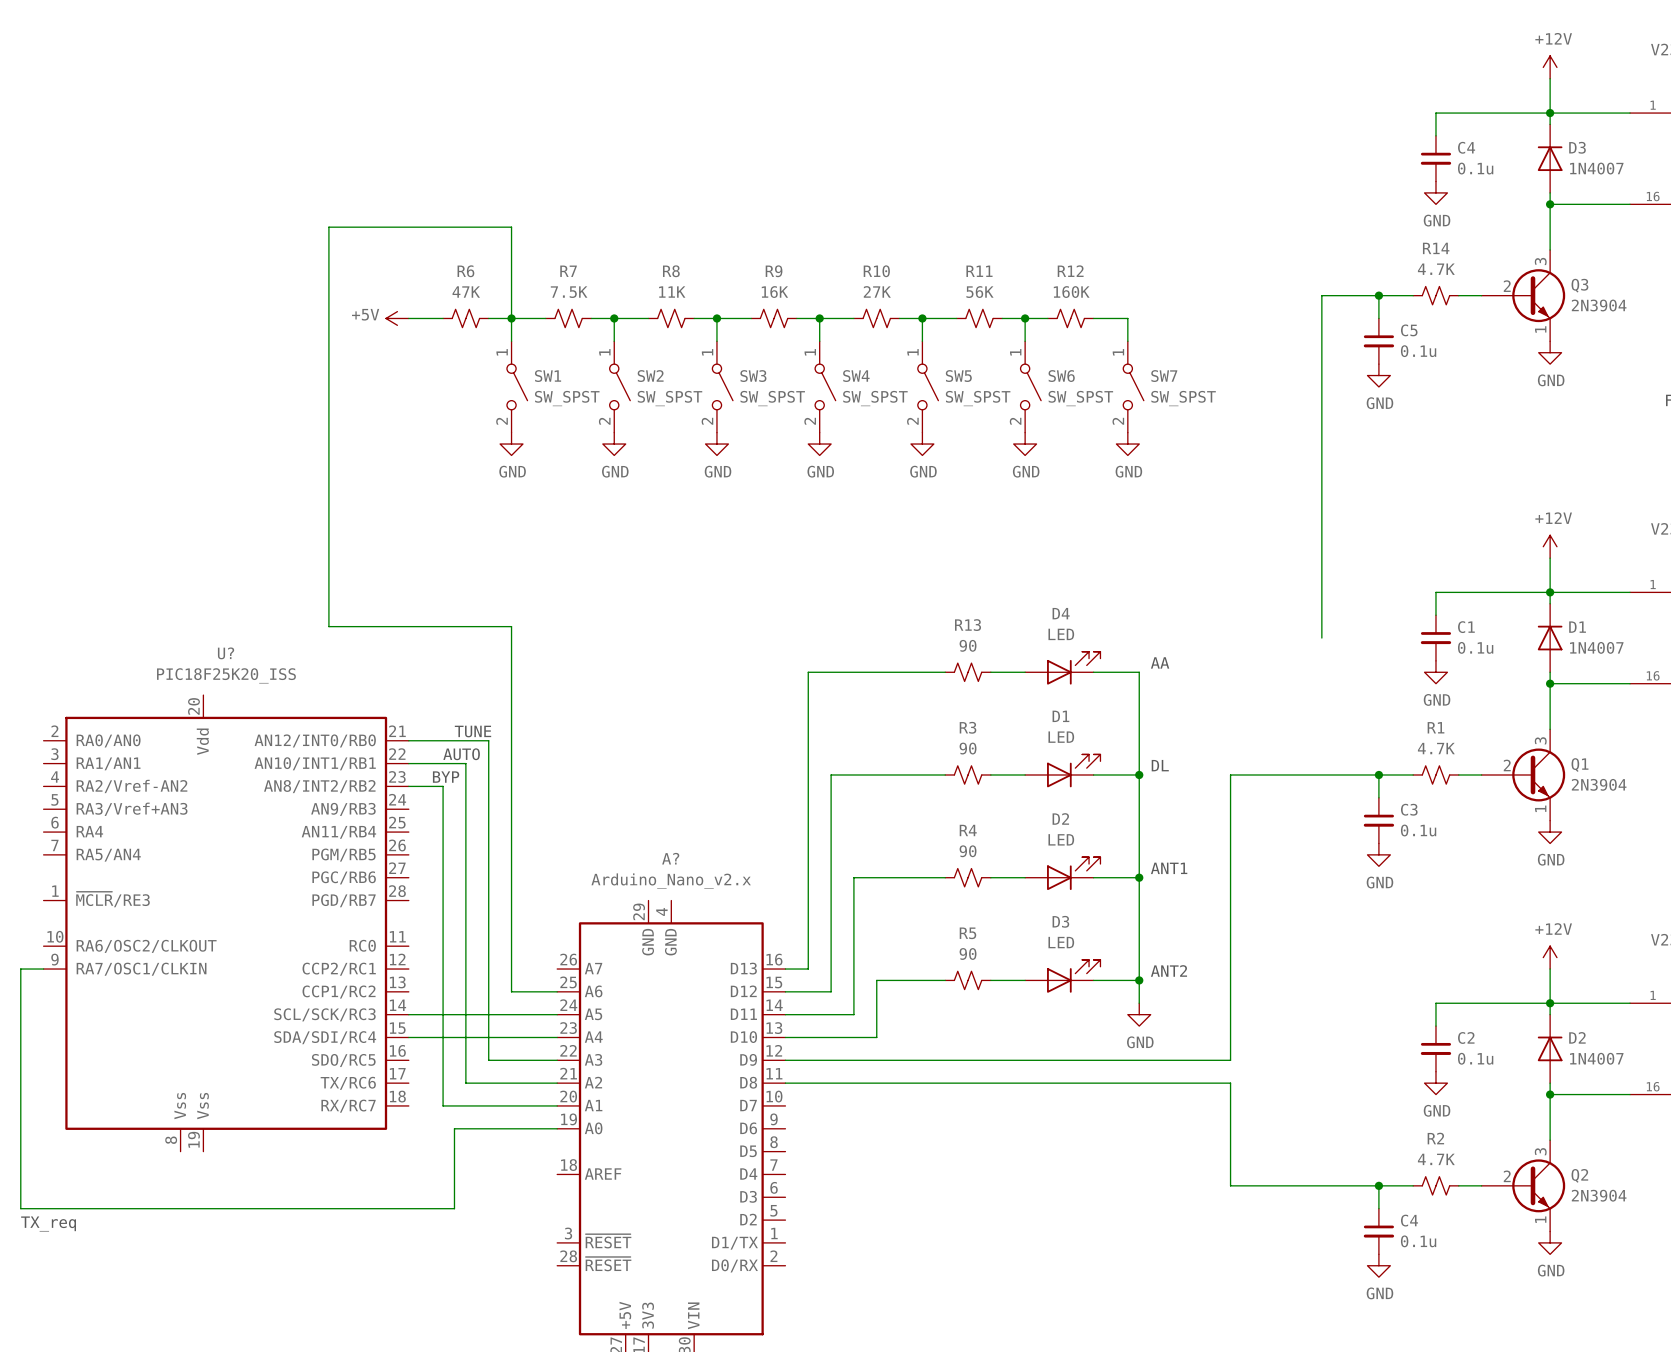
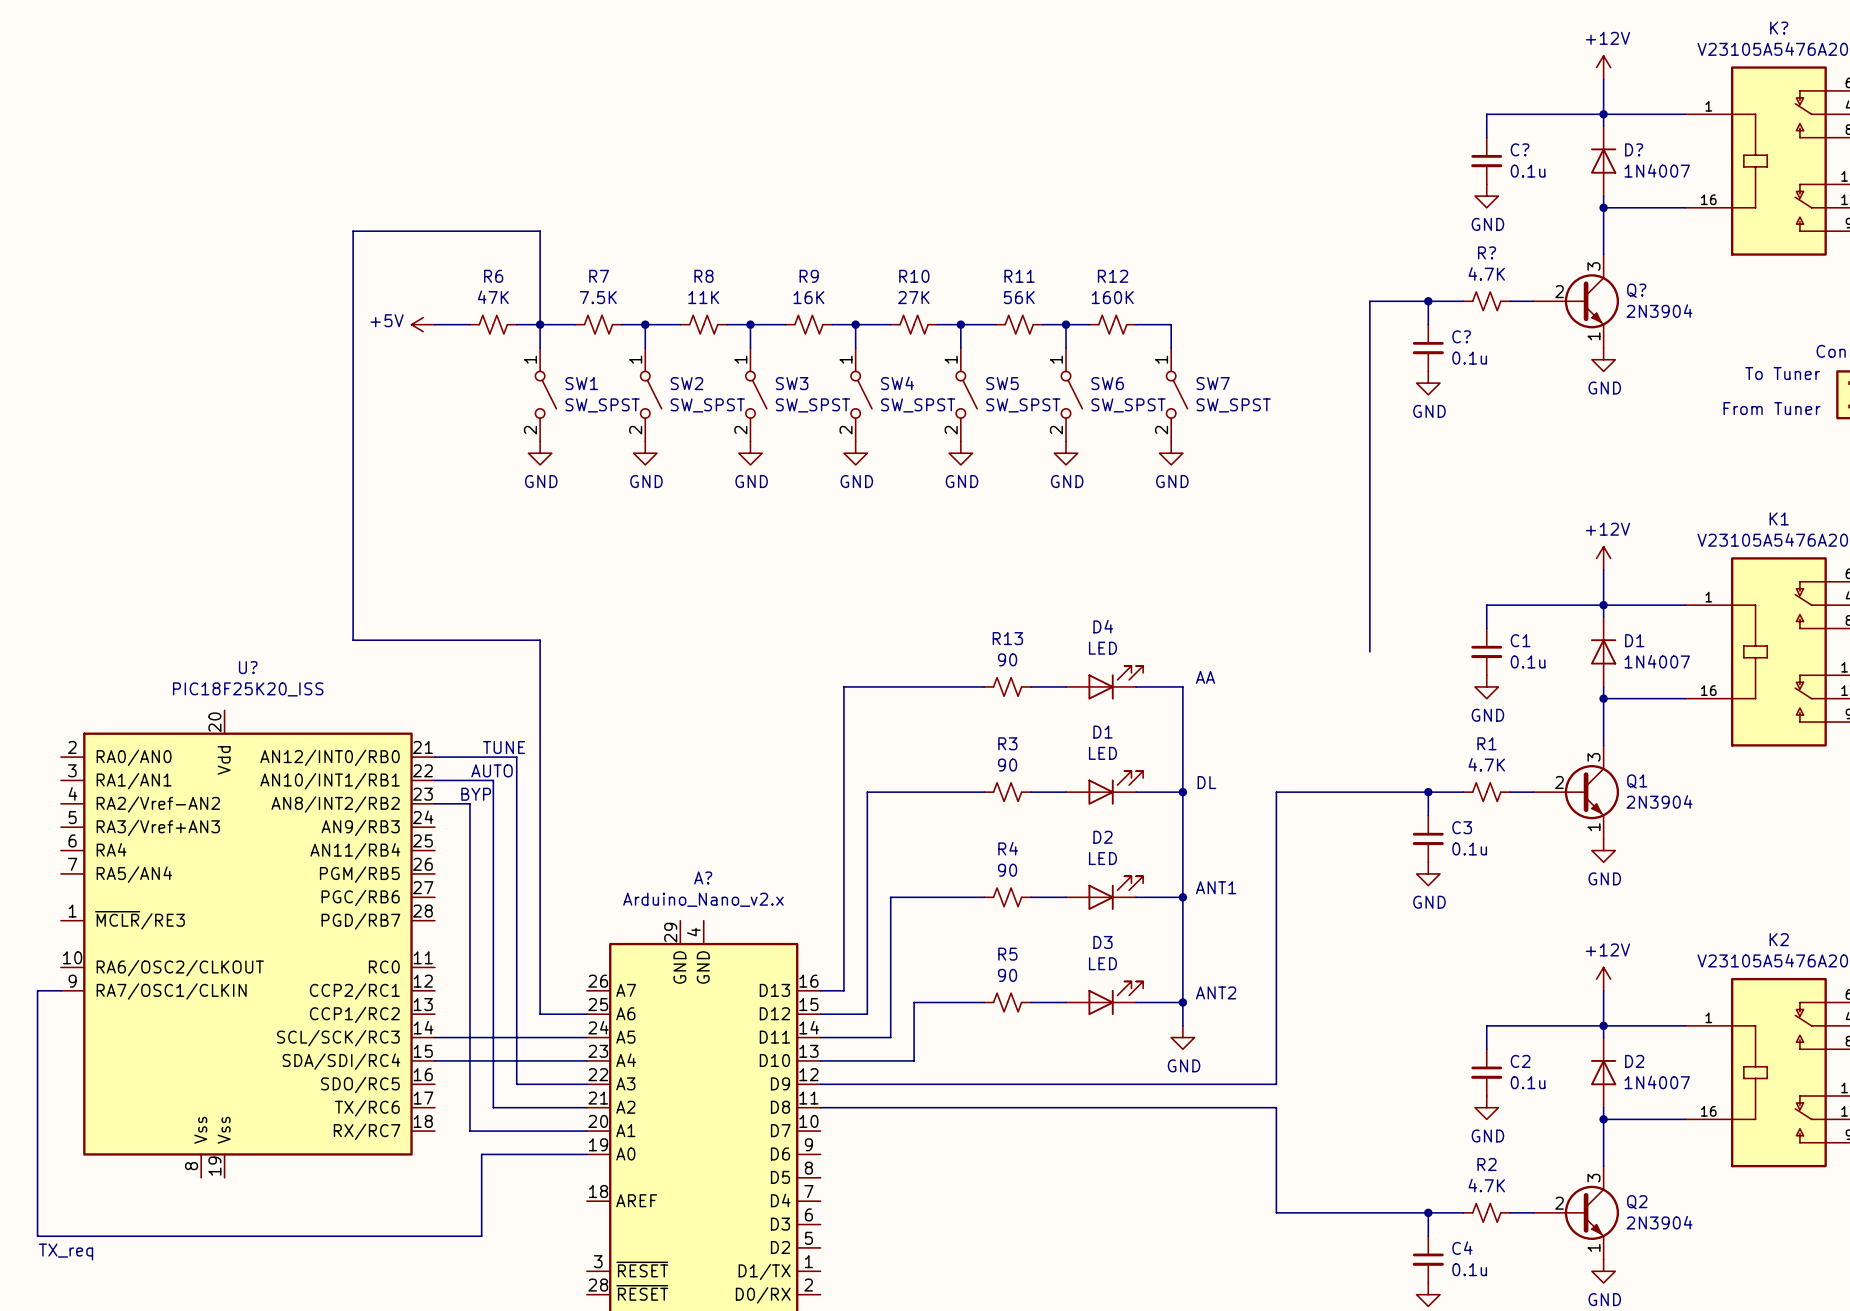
C4 name: C4 (1466, 147) -> C? (1520, 149)
D3 name: D3 (1577, 147) -> D? (1634, 149)
R14 name: R14 (1436, 248) -> R? (1487, 252)
Q3 name: Q3 (1579, 285) -> Q? (1636, 290)
C5 name: C5 (1409, 330) -> C? (1461, 336)

